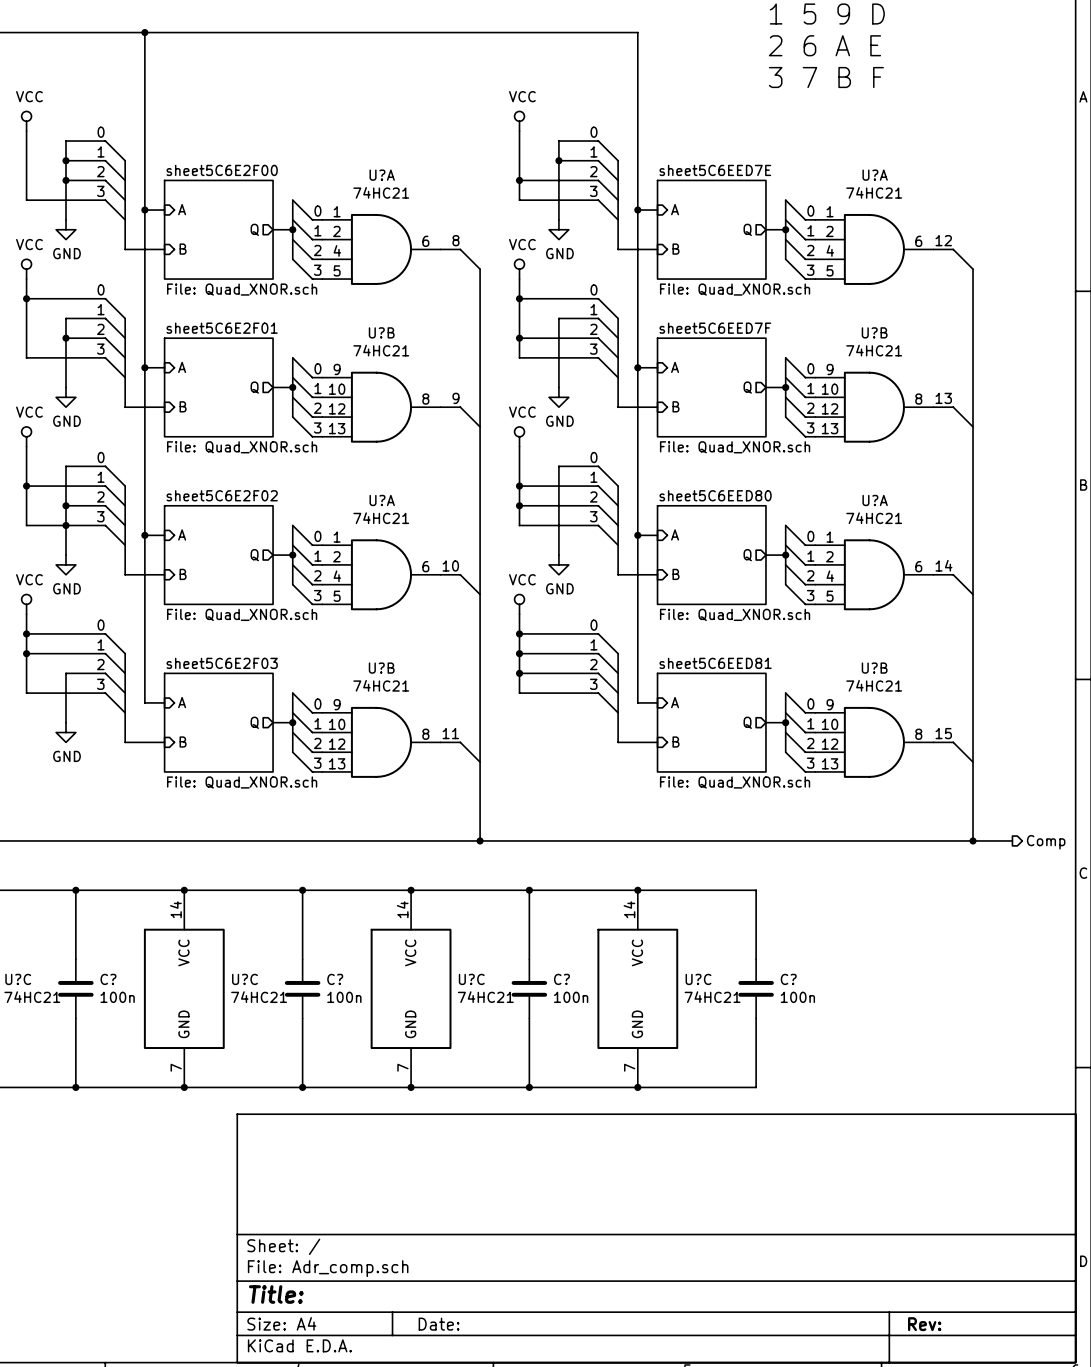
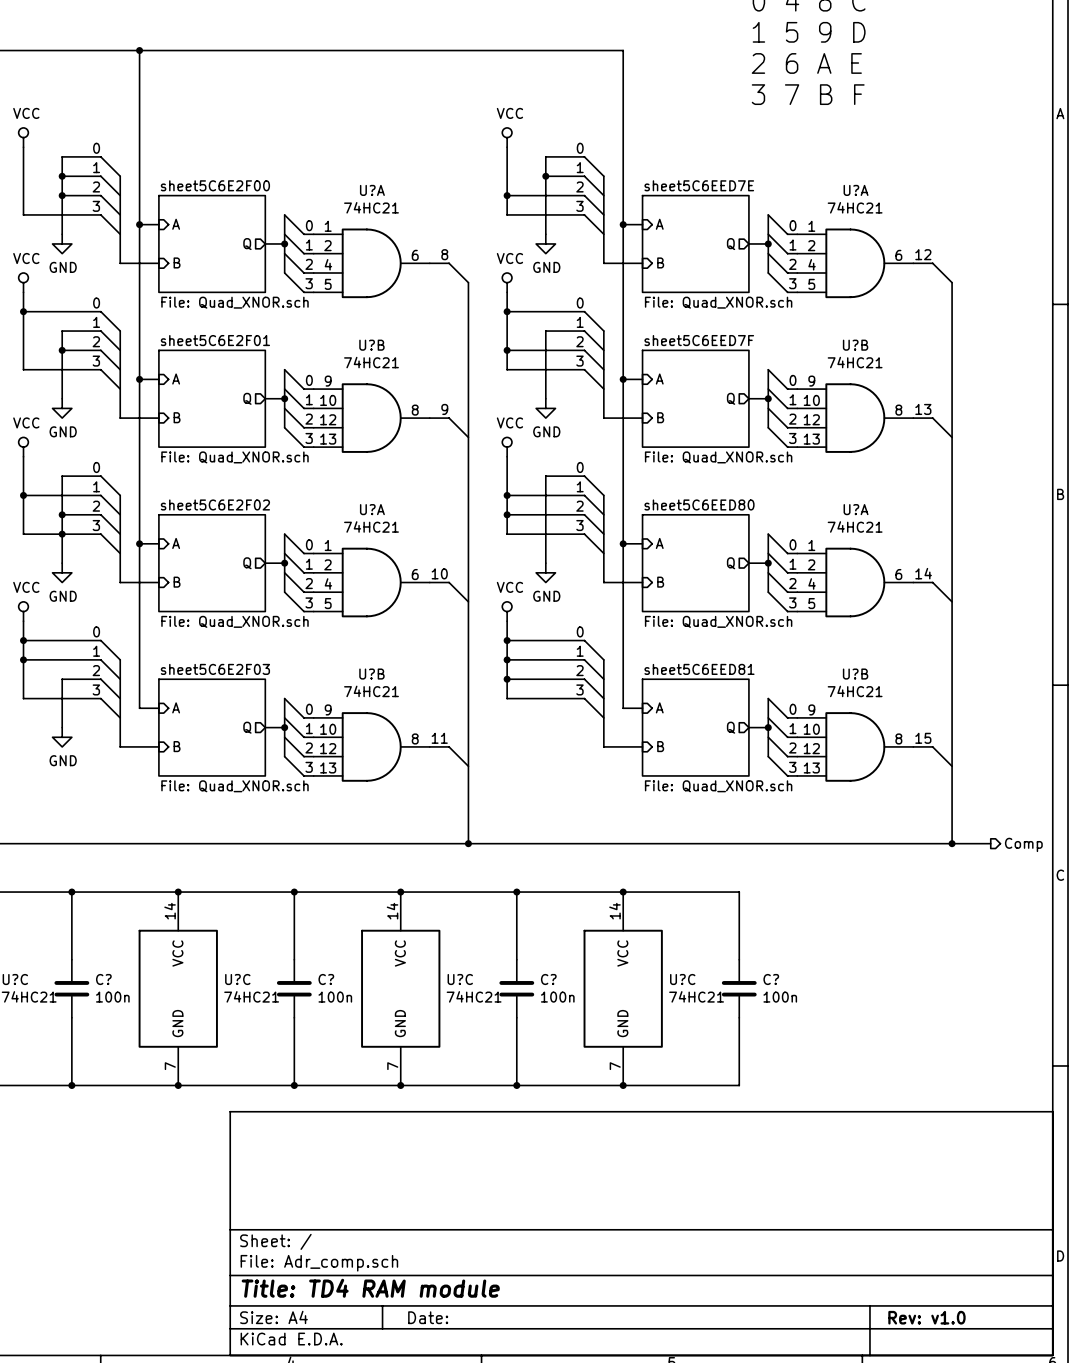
title block: Title: (276, 1294) -> Title: TD4 RAM module (370, 1288)
title block: Rev: (924, 1324) -> Rev: v1.0 (926, 1317)

